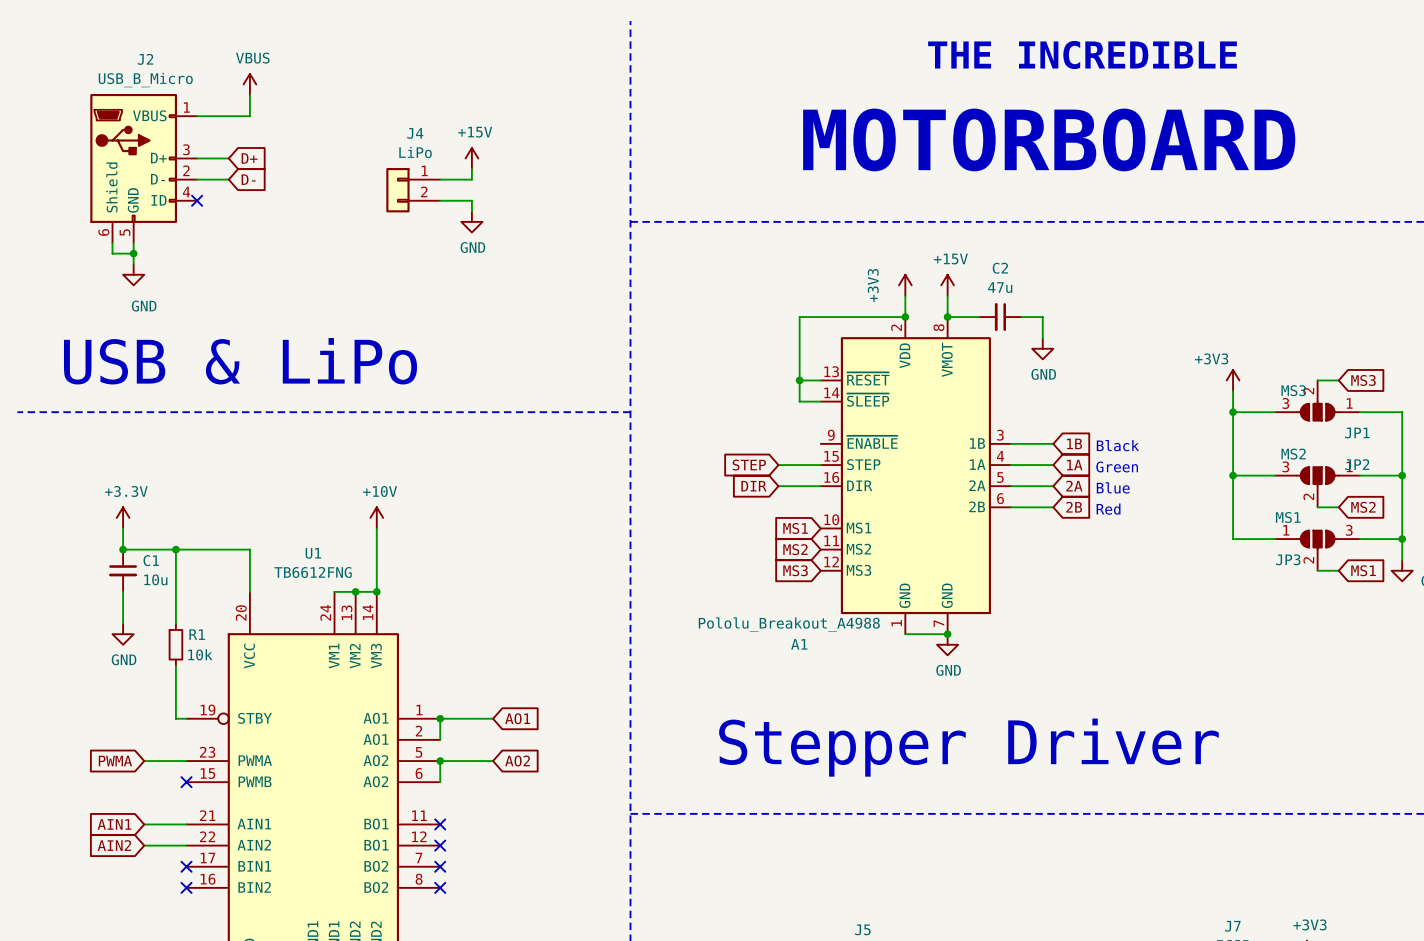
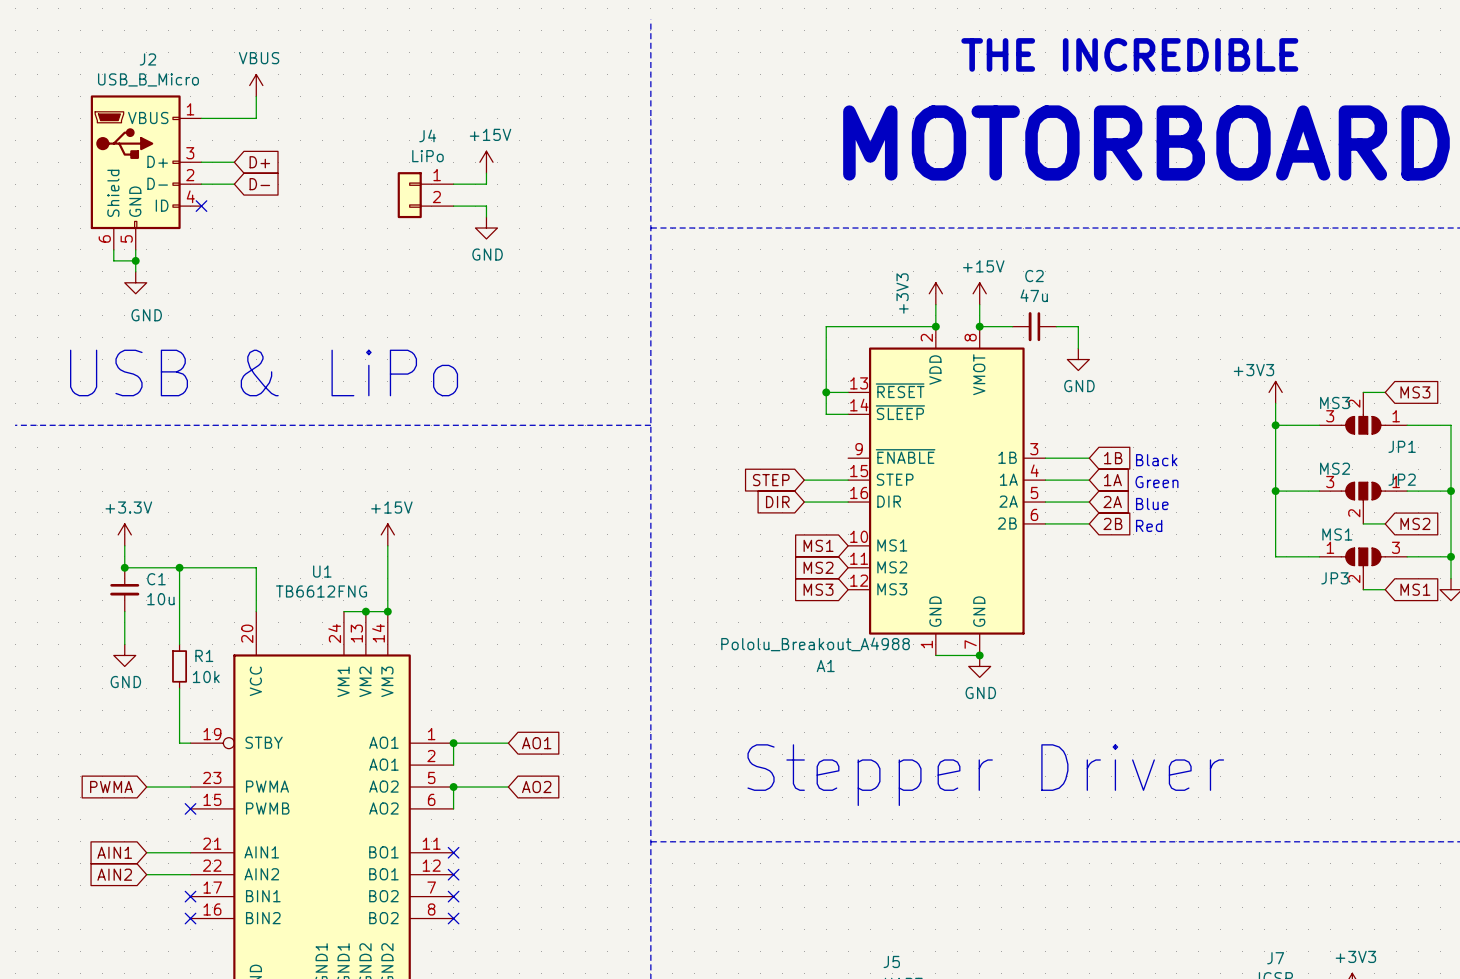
power symbol: +10V (376, 517) -> +15V (387, 534)

